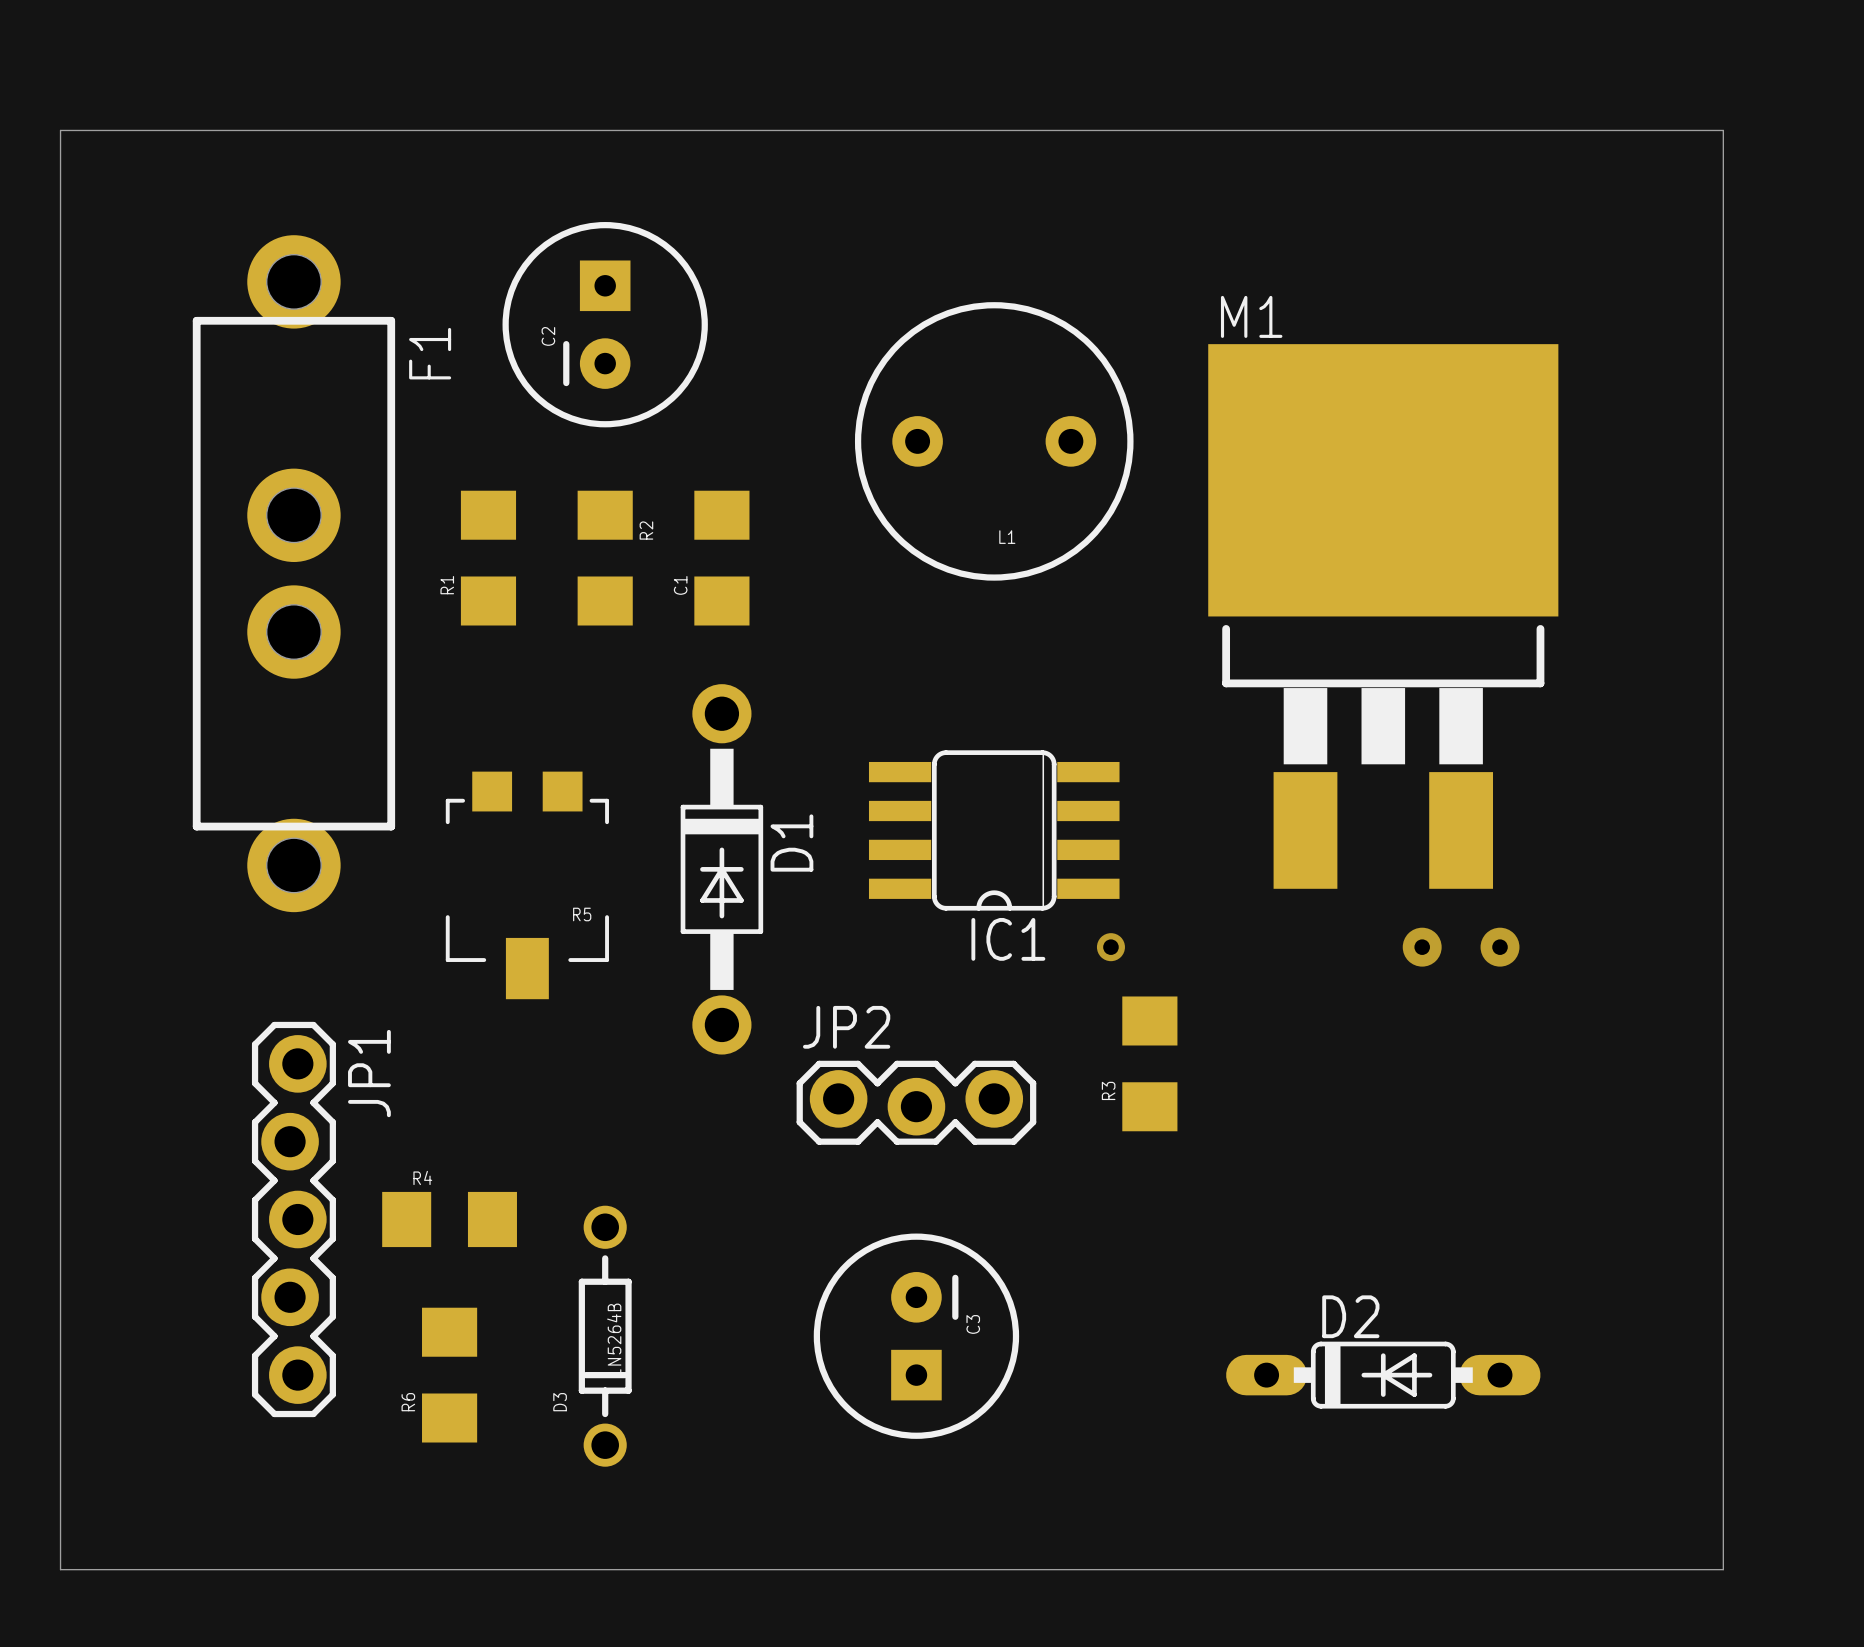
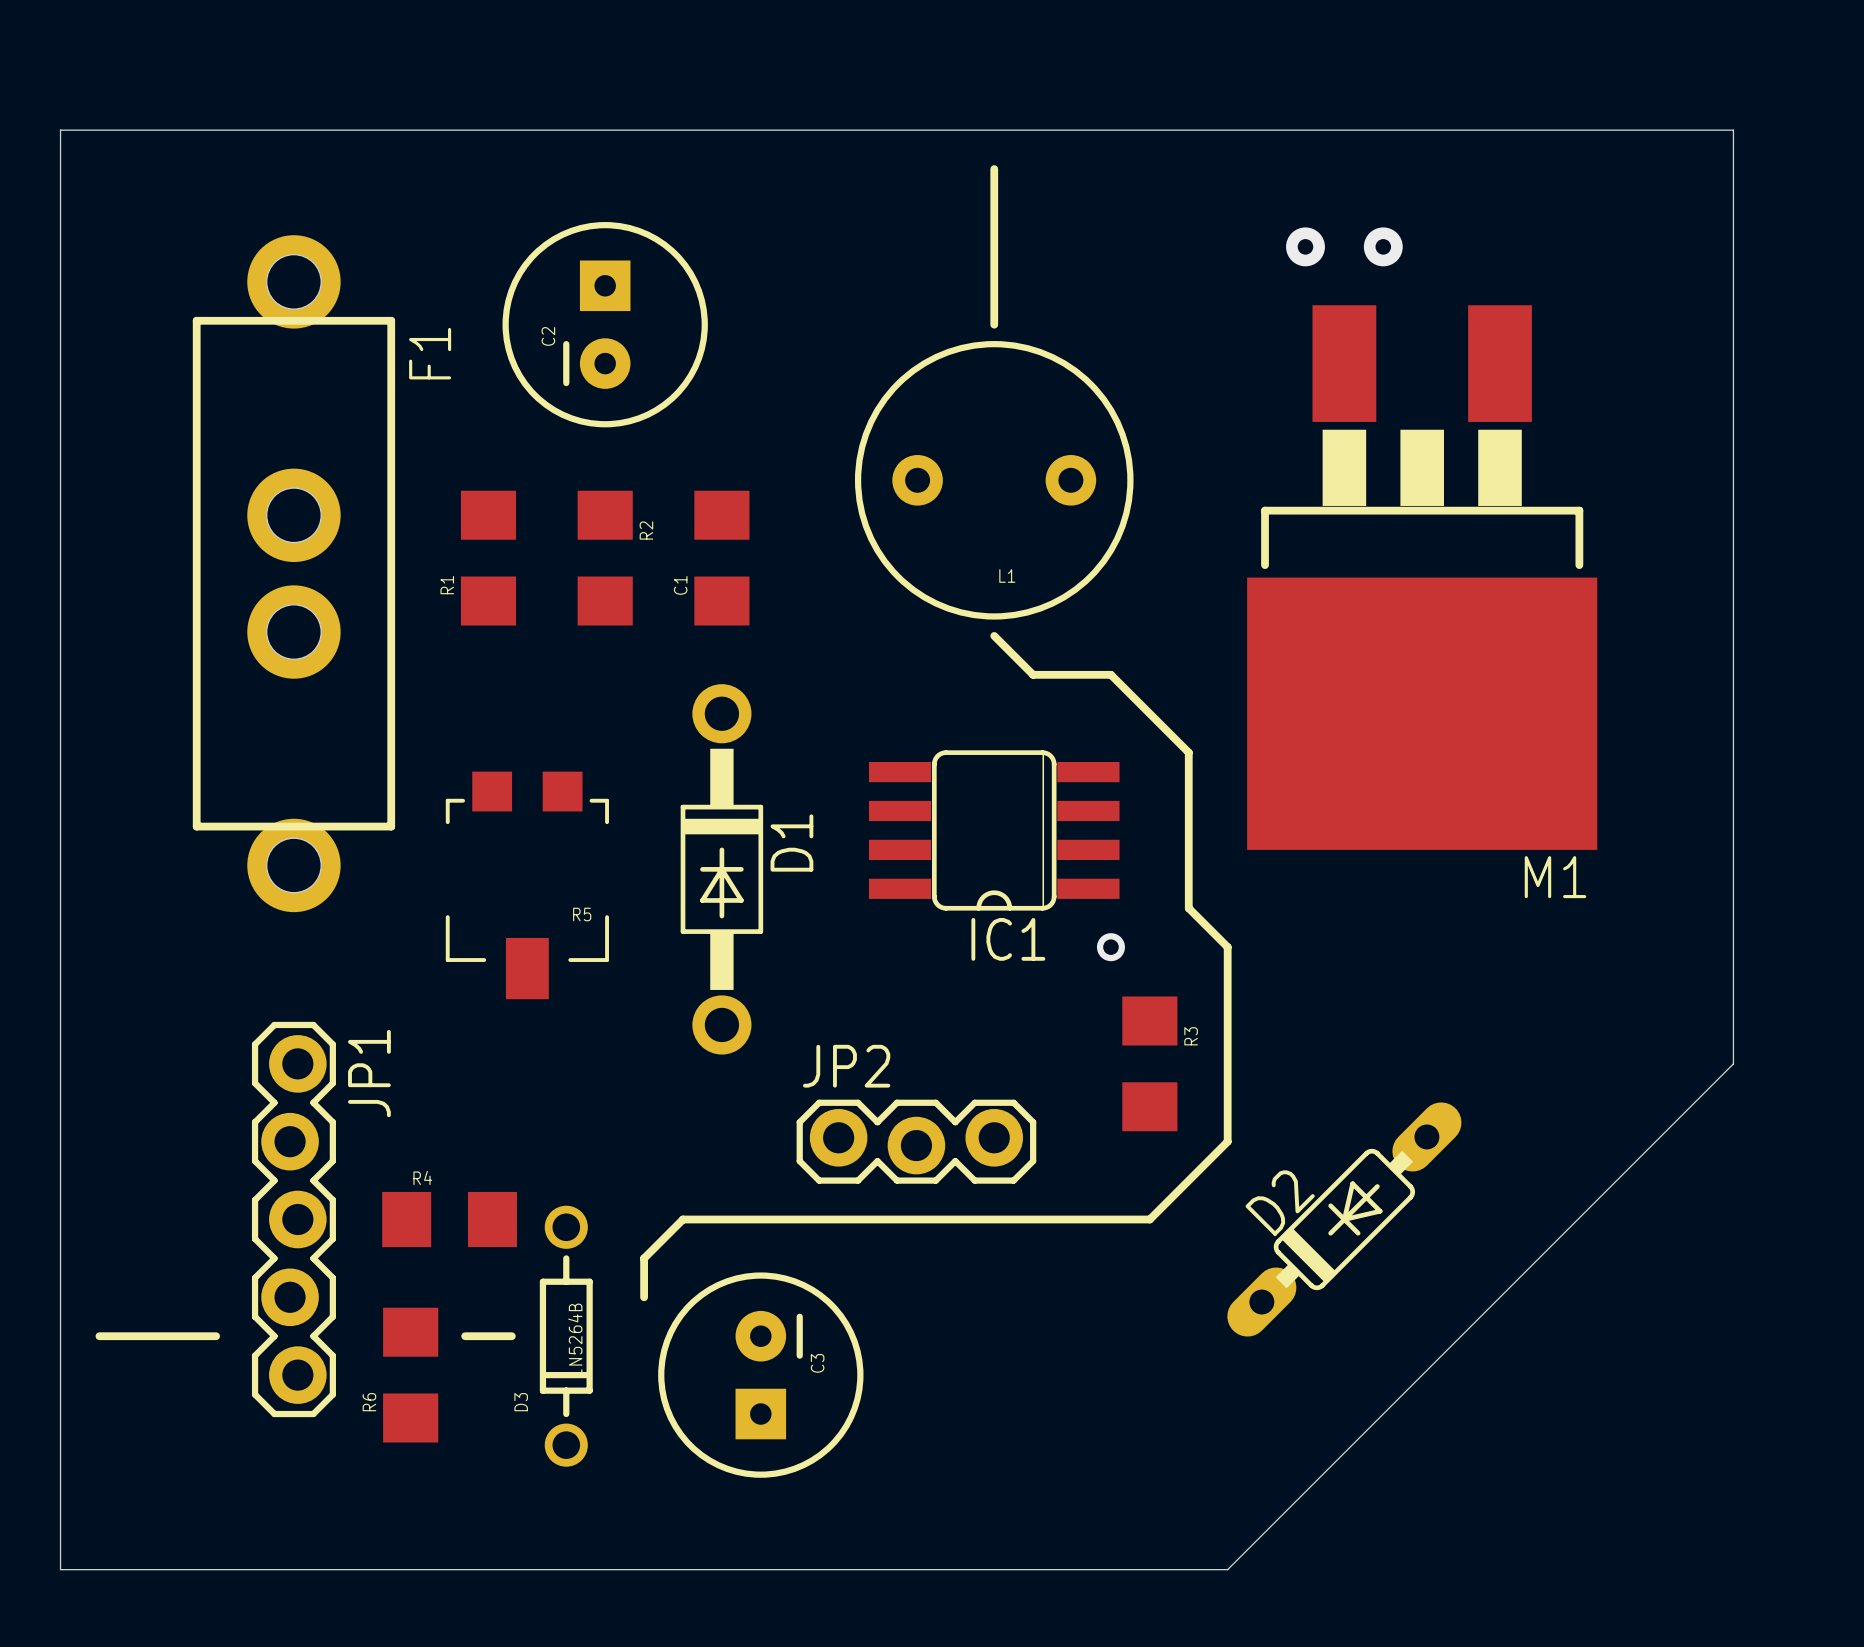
board edge: (60, 130) (1723, 130) (1723, 1569) (1227, 1569) -> (60, 130) (1733, 130) (1733, 1063) (1227, 1569)
line: none -> (994, 169) (994, 324)
via: none -> (1305, 246)
via: none -> (1383, 246)
L1 position: (994, 441) -> (994, 480)
M1 rotation: 0° (1383, 616) -> 180° (1422, 577)
line: none -> (994, 635) (1033, 674) (1110, 674) (1188, 752) (1188, 908) (1227, 947) (1227, 1141) (1149, 1219) (683, 1219) (644, 1258) (644, 1297)
via: (1422, 947) -> none
via: (1500, 947) -> none
R3 name position: R3 (1108, 1090) -> R3 (1191, 1036)
JP2 position: (916, 1102) -> (916, 1141)
line: none -> (99, 1336) (216, 1336)
line: none -> (465, 1336) (511, 1336)
D3 position: (605, 1336) -> (566, 1336)
C3 position: (916, 1336) -> (760, 1375)
R6 position: (449, 1375) -> (410, 1375)
D2 rotation: 0° (1383, 1375) -> 45° counterclockwise (1344, 1219)

